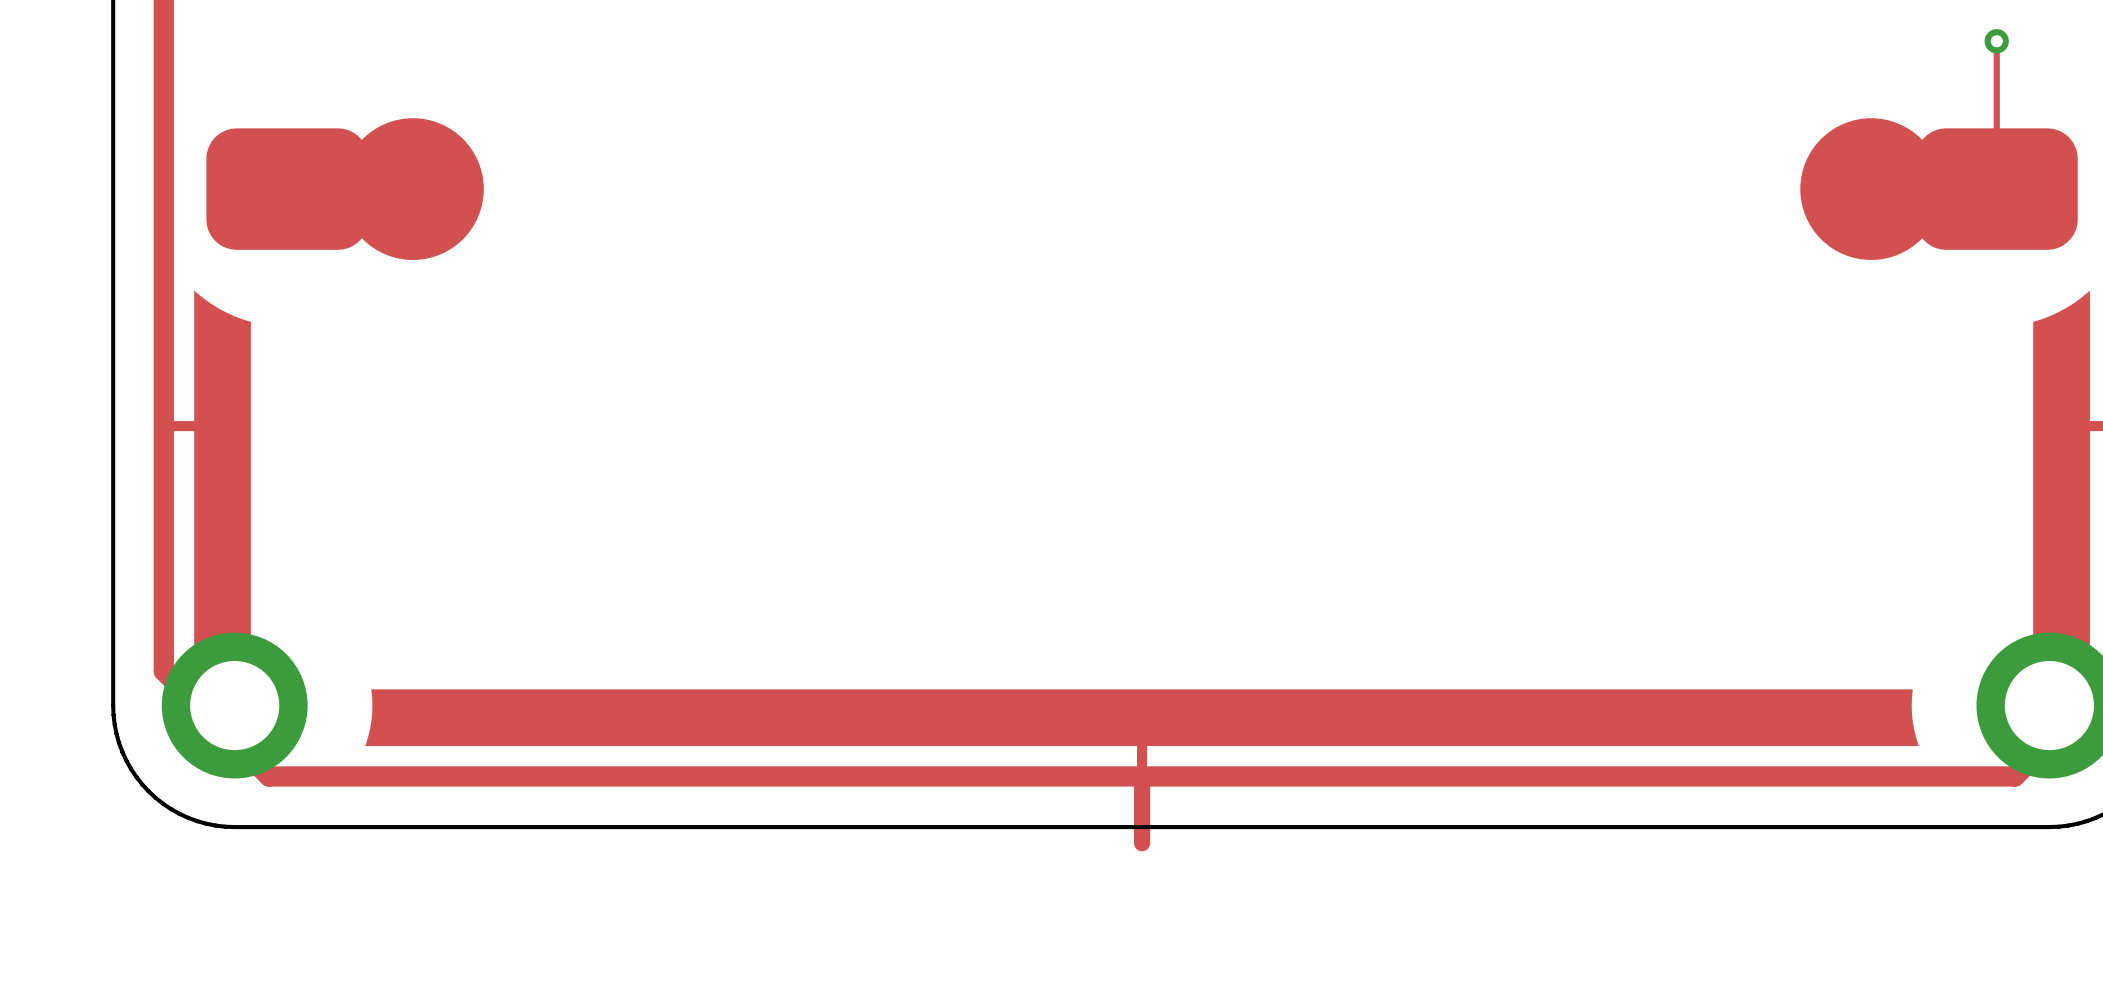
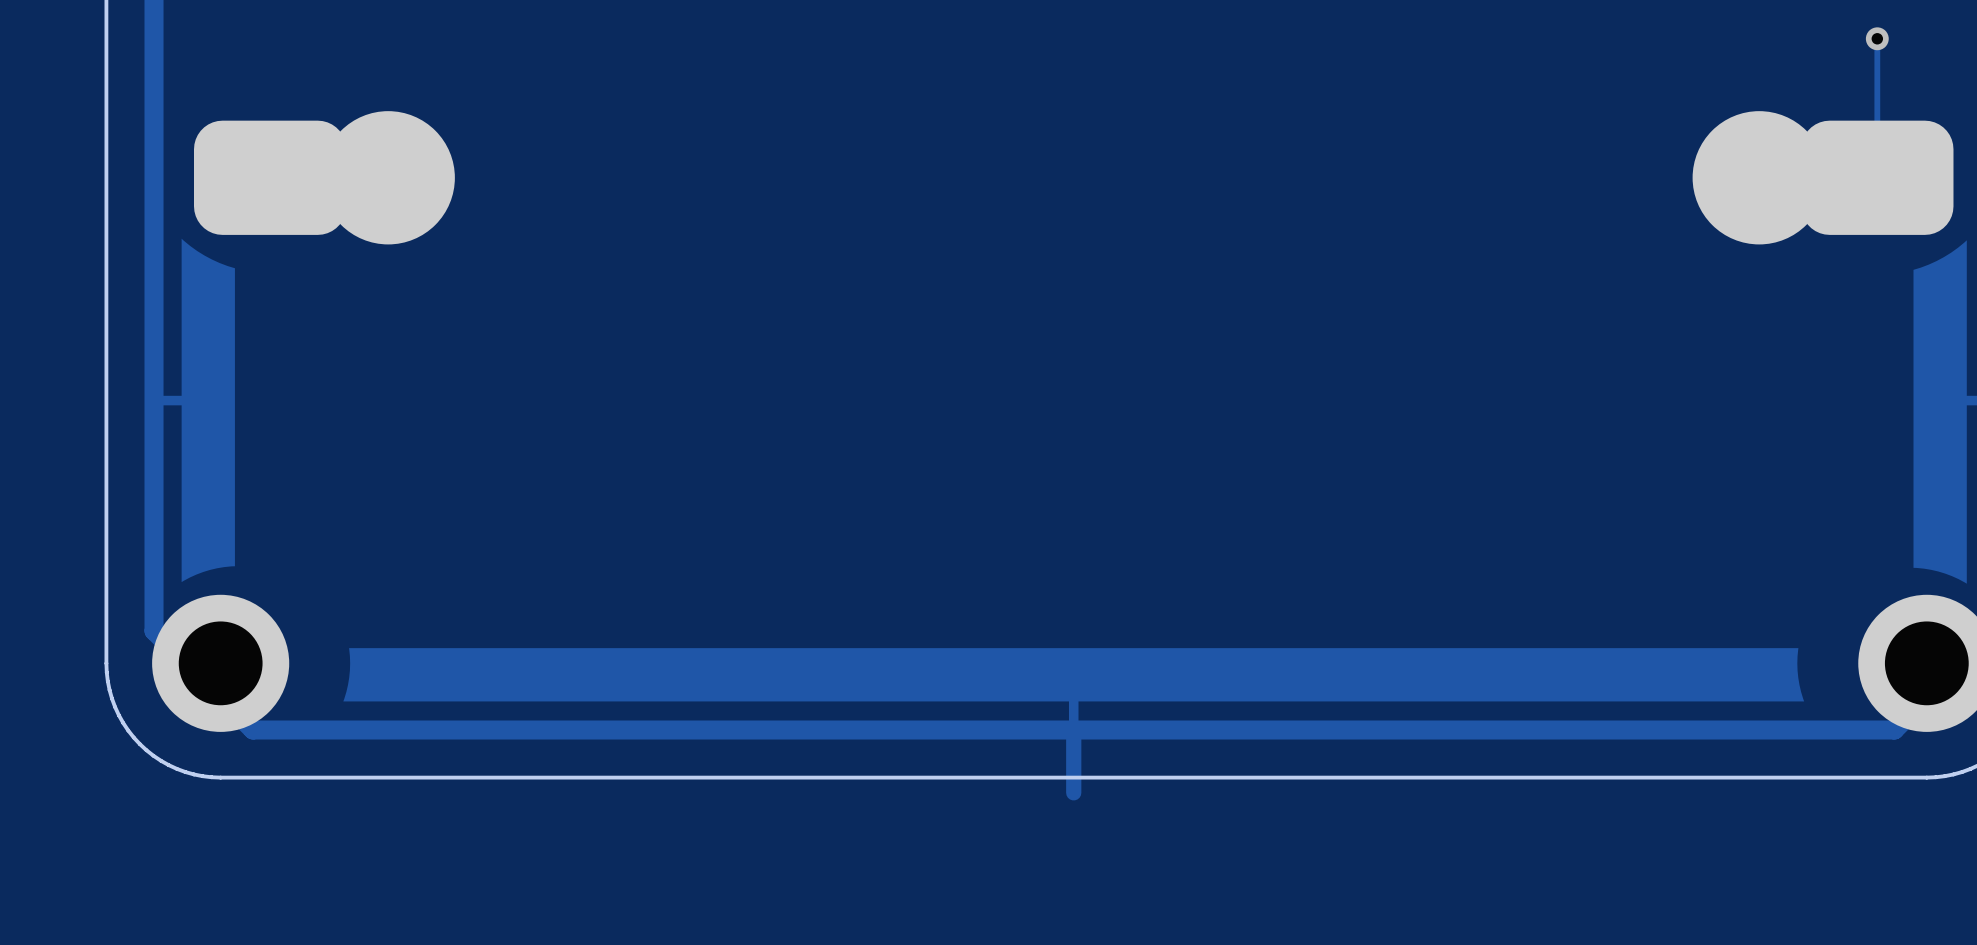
drawing position: (222, 473) -> (208, 410)
drawing position: (2061, 473) -> (1940, 412)

